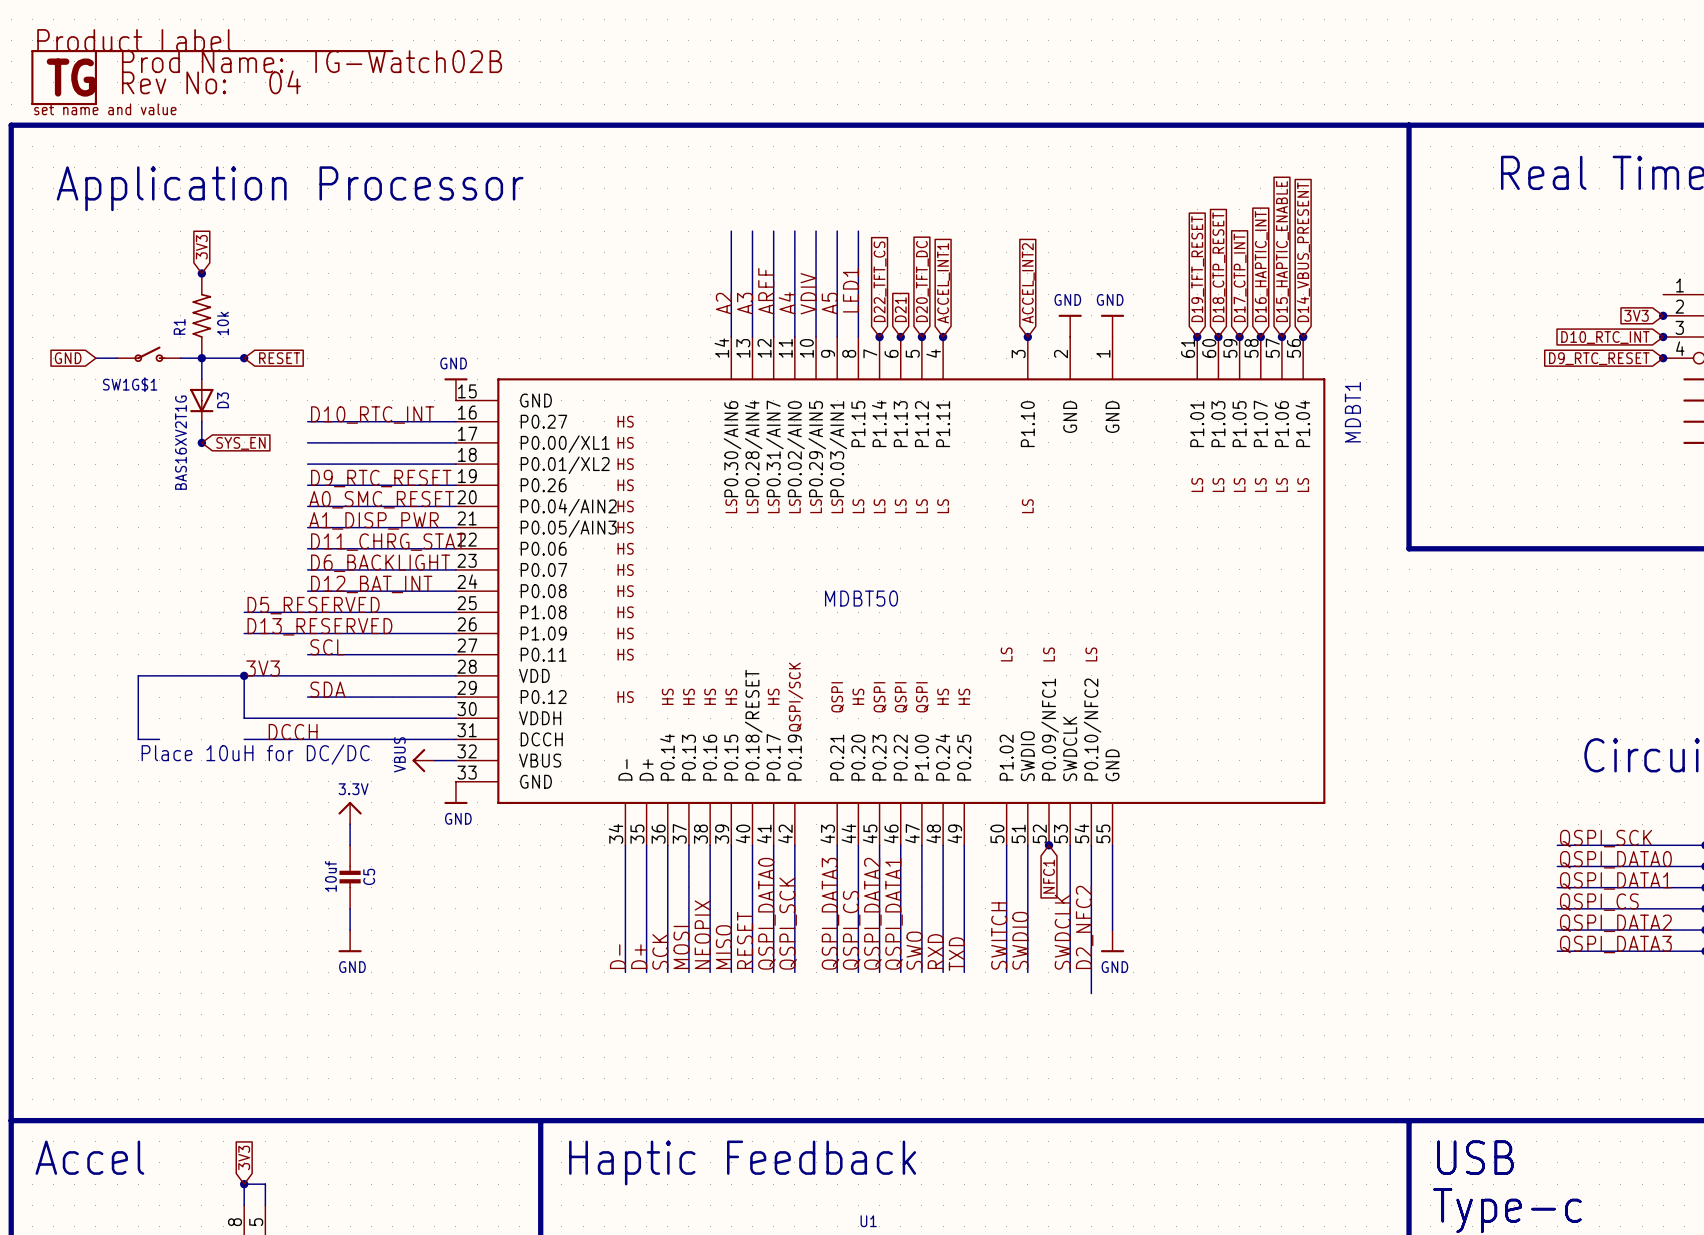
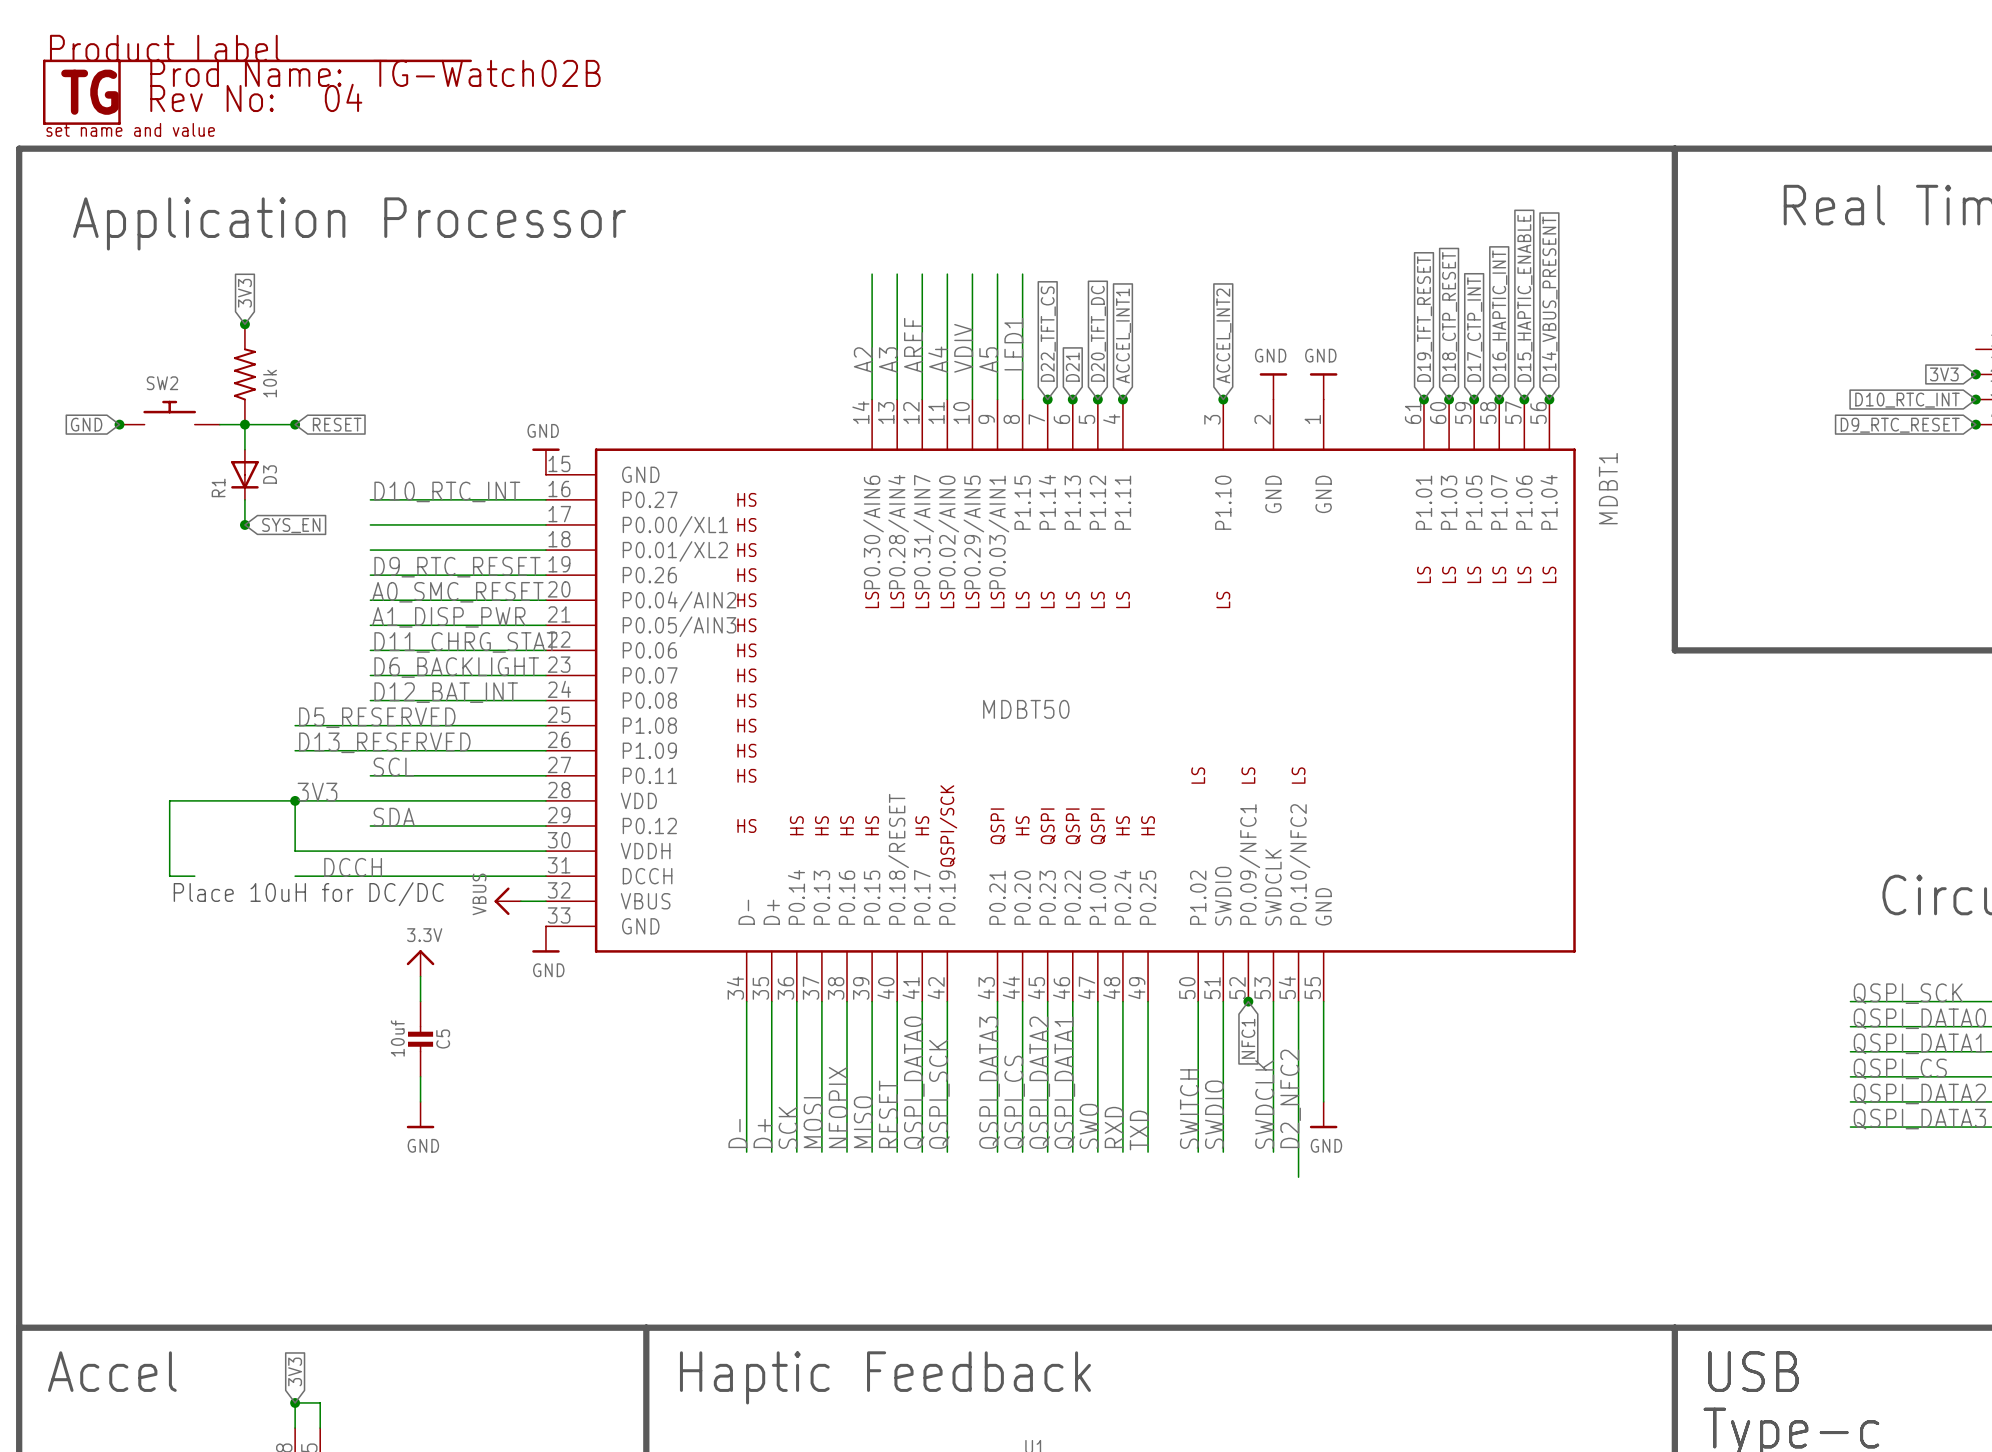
R1 name position: R1 (179, 326) -> R1 (218, 487)
SW2: none -> (169, 412)
SW1G$1: (148, 354) -> none
junction: none -> (119, 424)
D3 value: BAS16XV2T1G (180, 442) -> none

